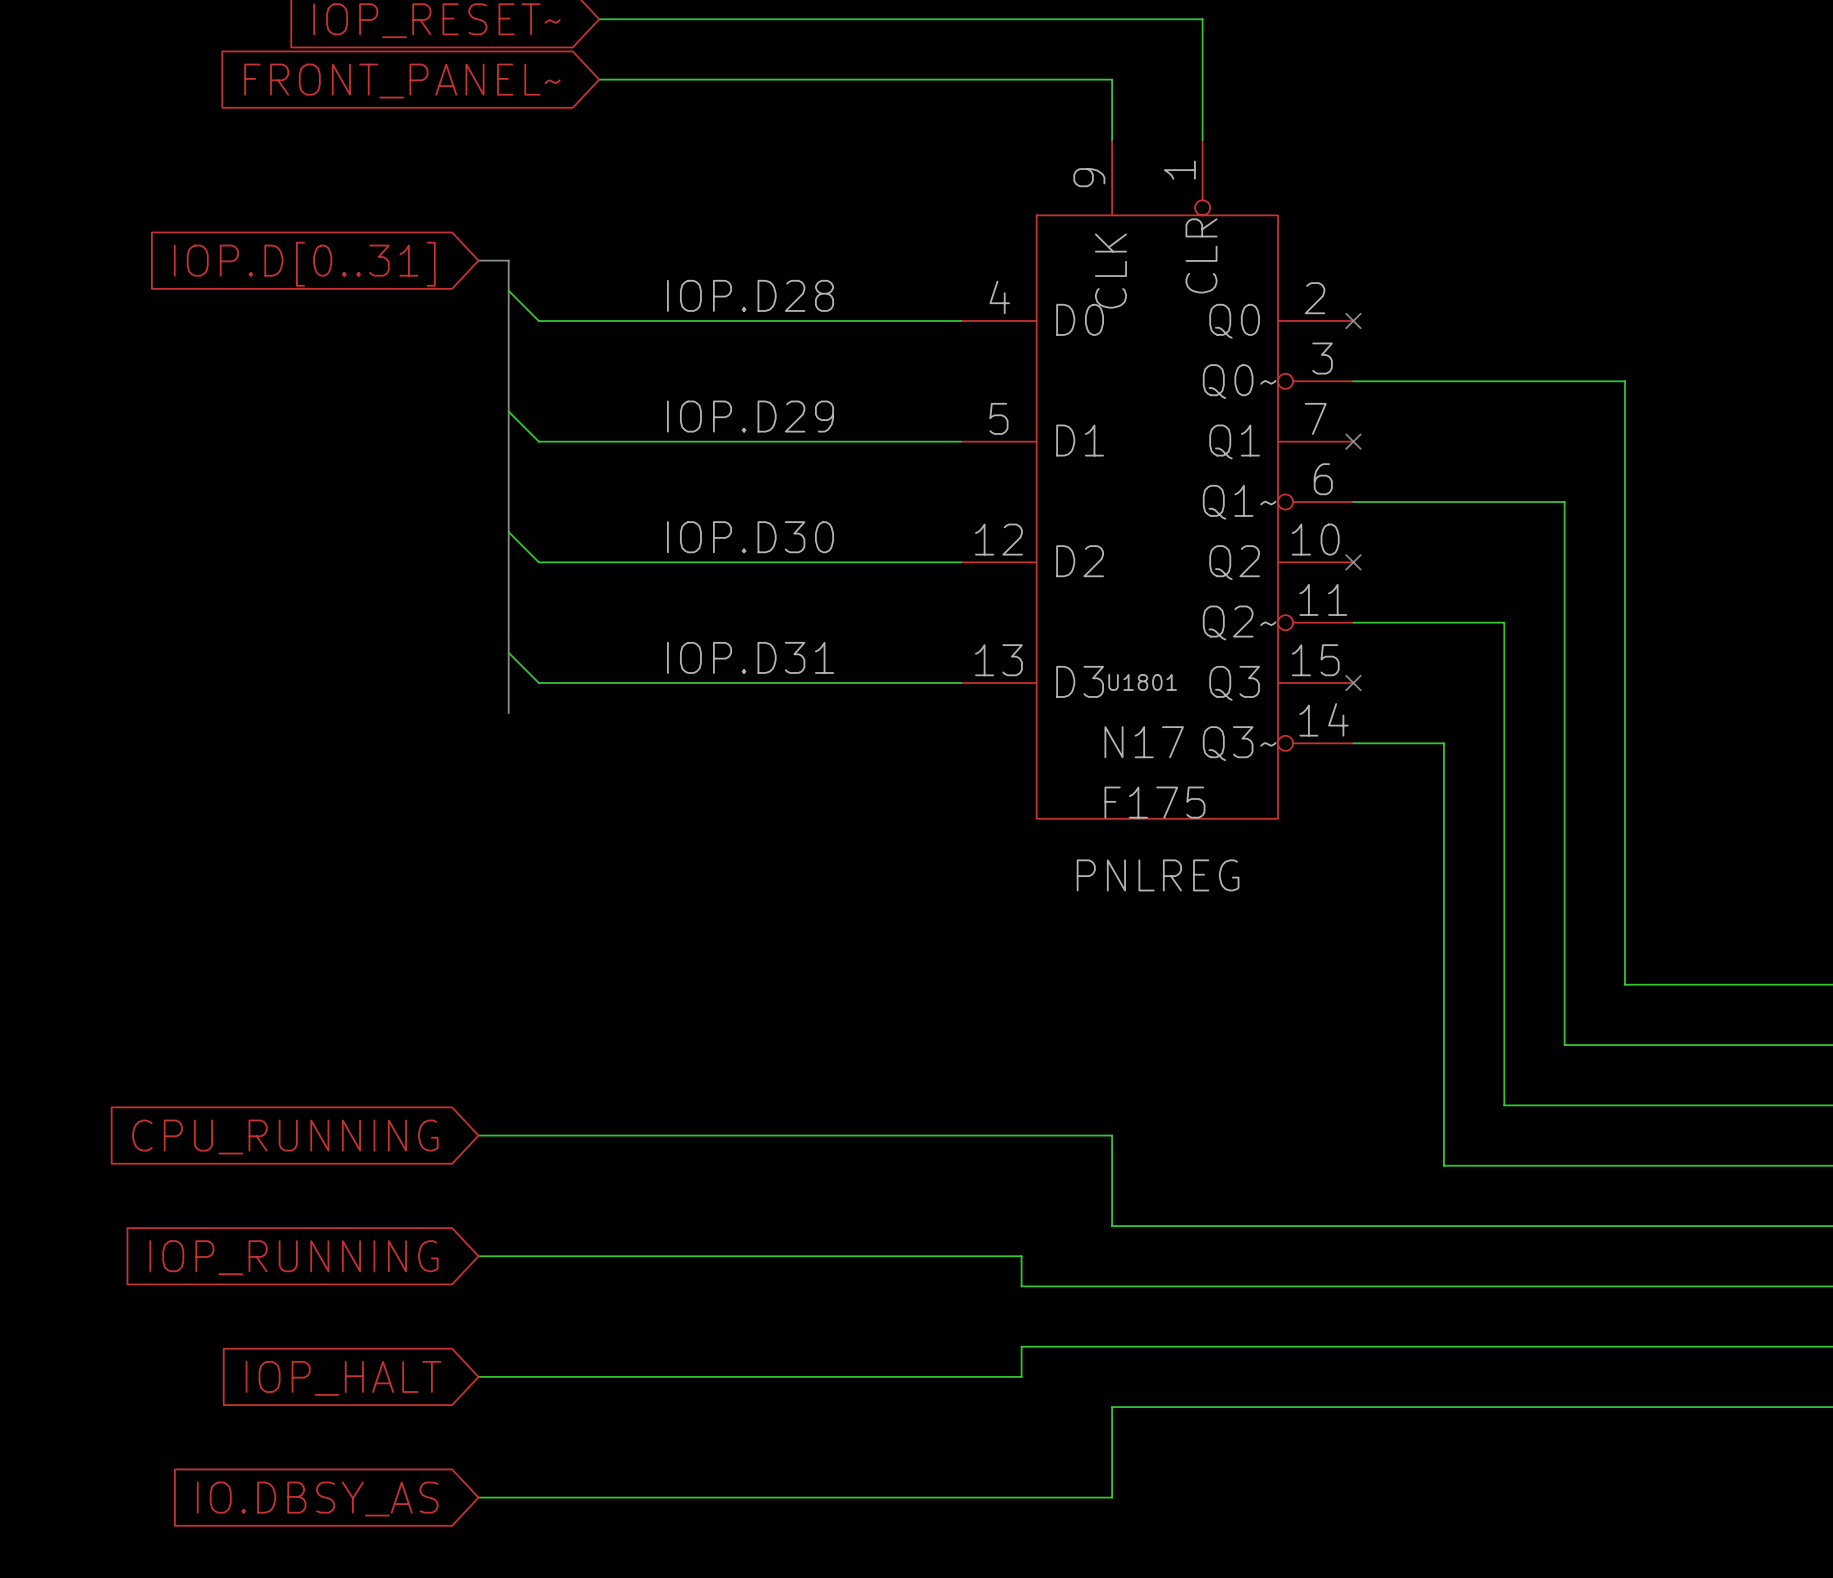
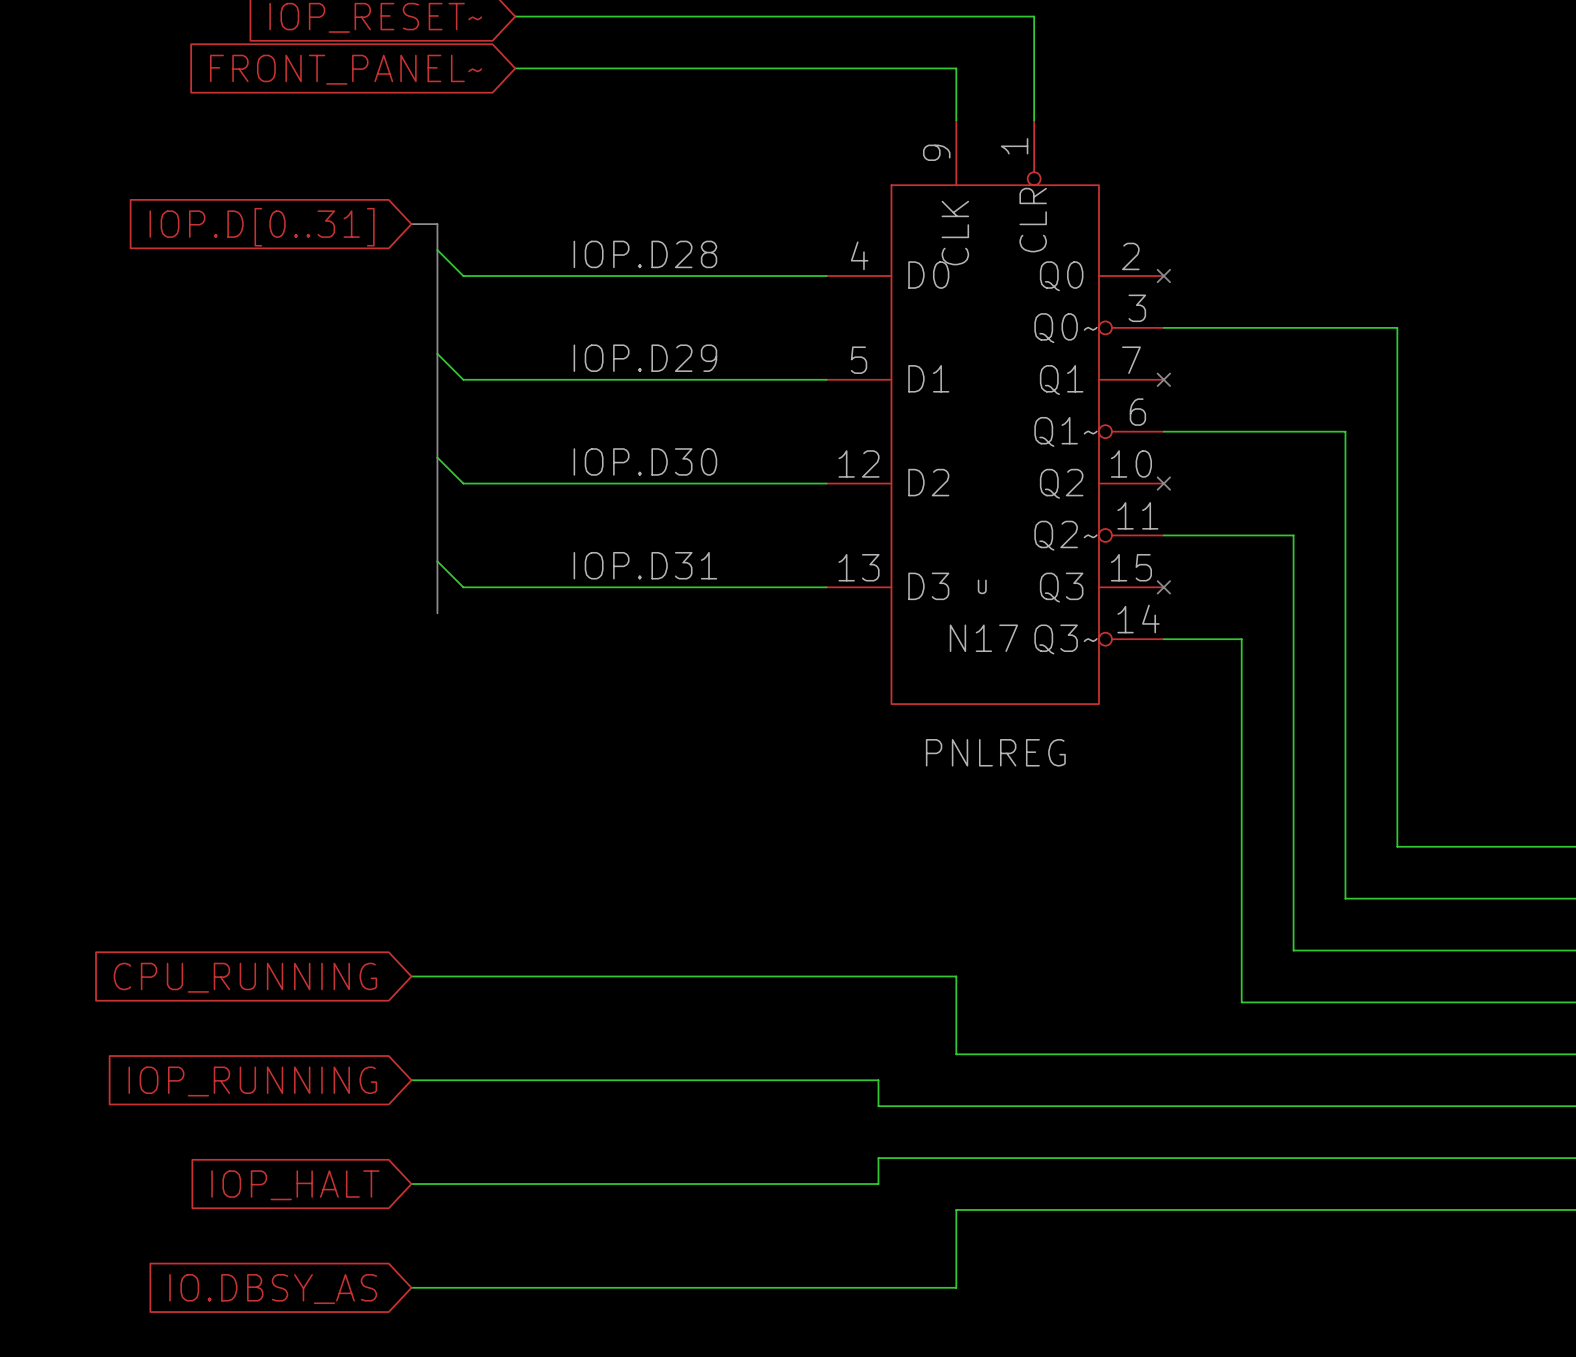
U1801 name: U1801 (1142, 682) -> U (982, 586)
U1801 value: F175 (1154, 802) -> none

